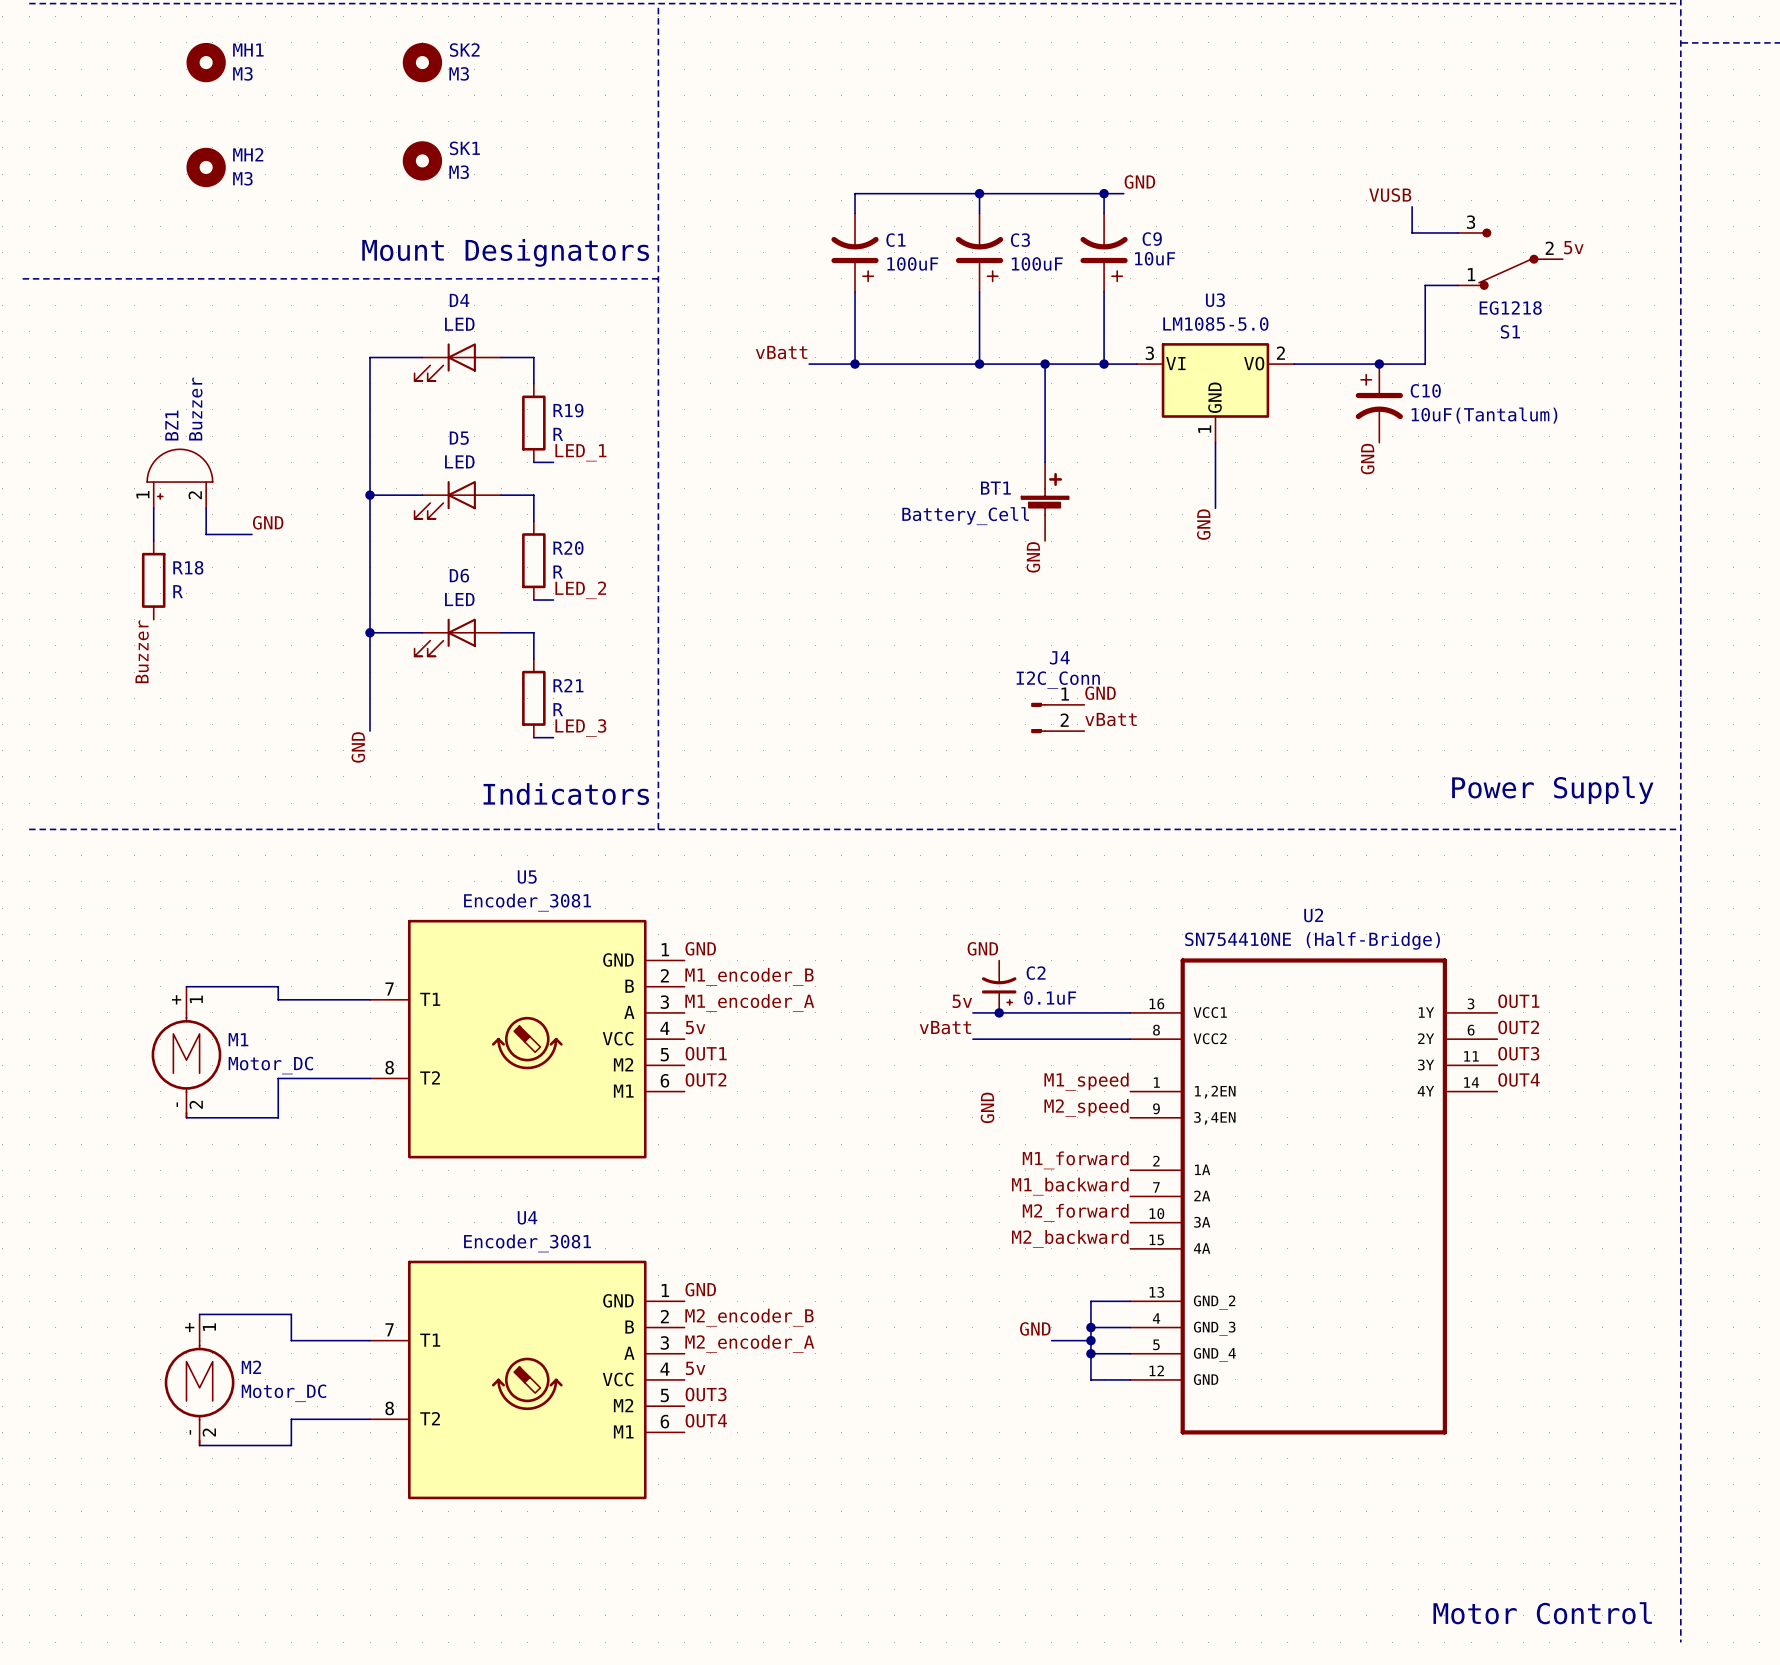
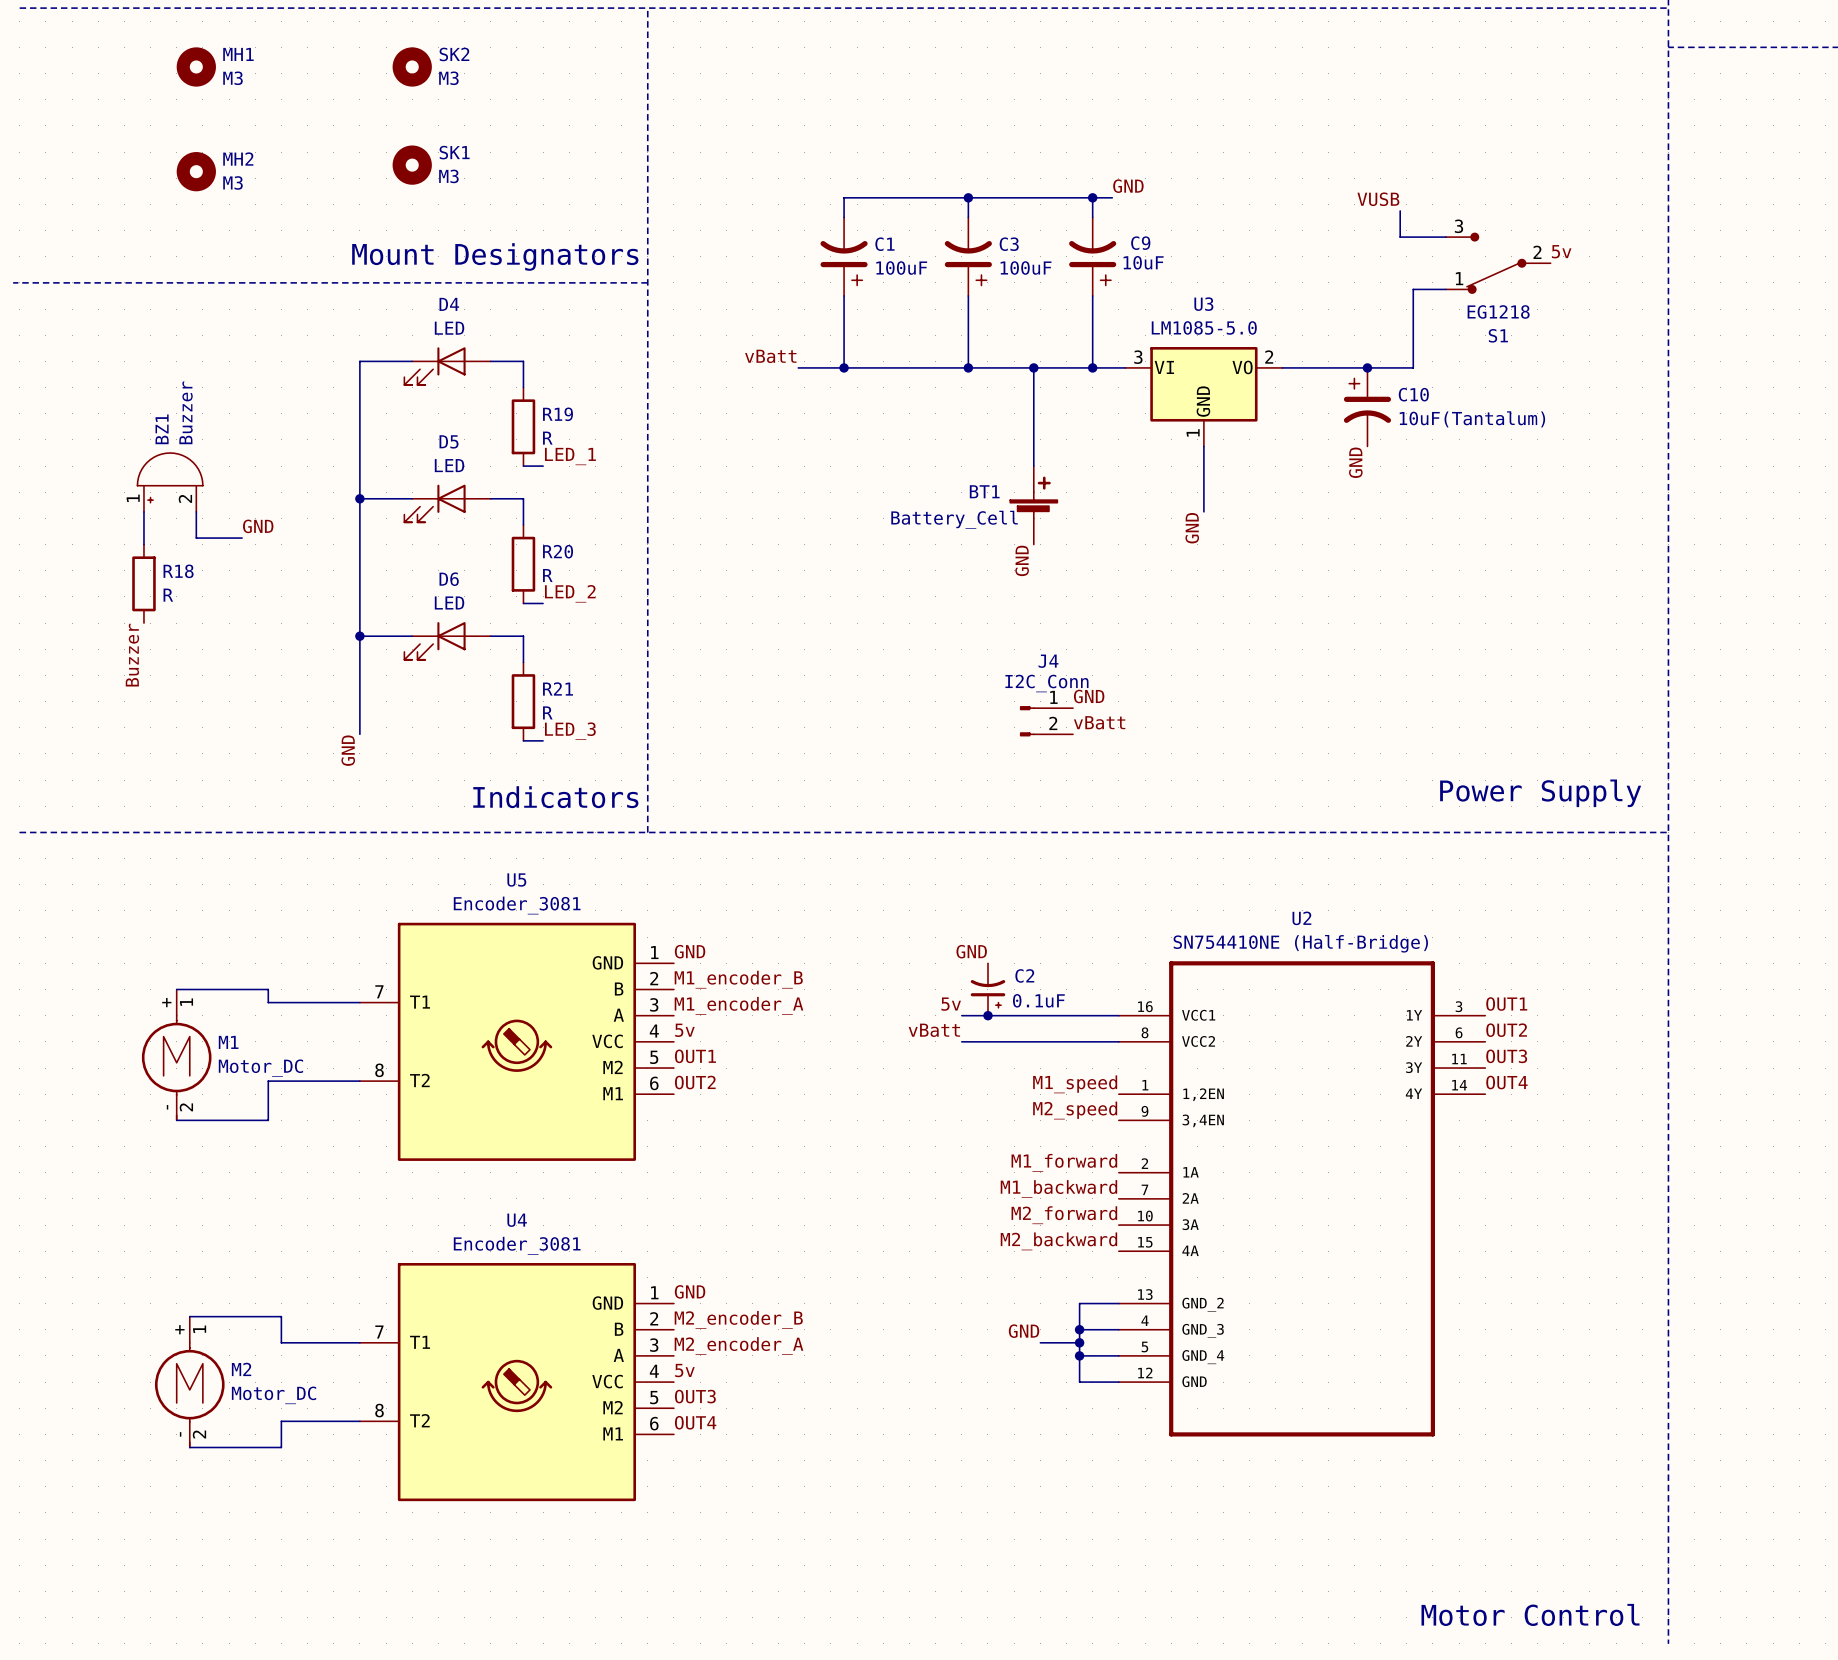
label: GND (987, 1107) -> none

